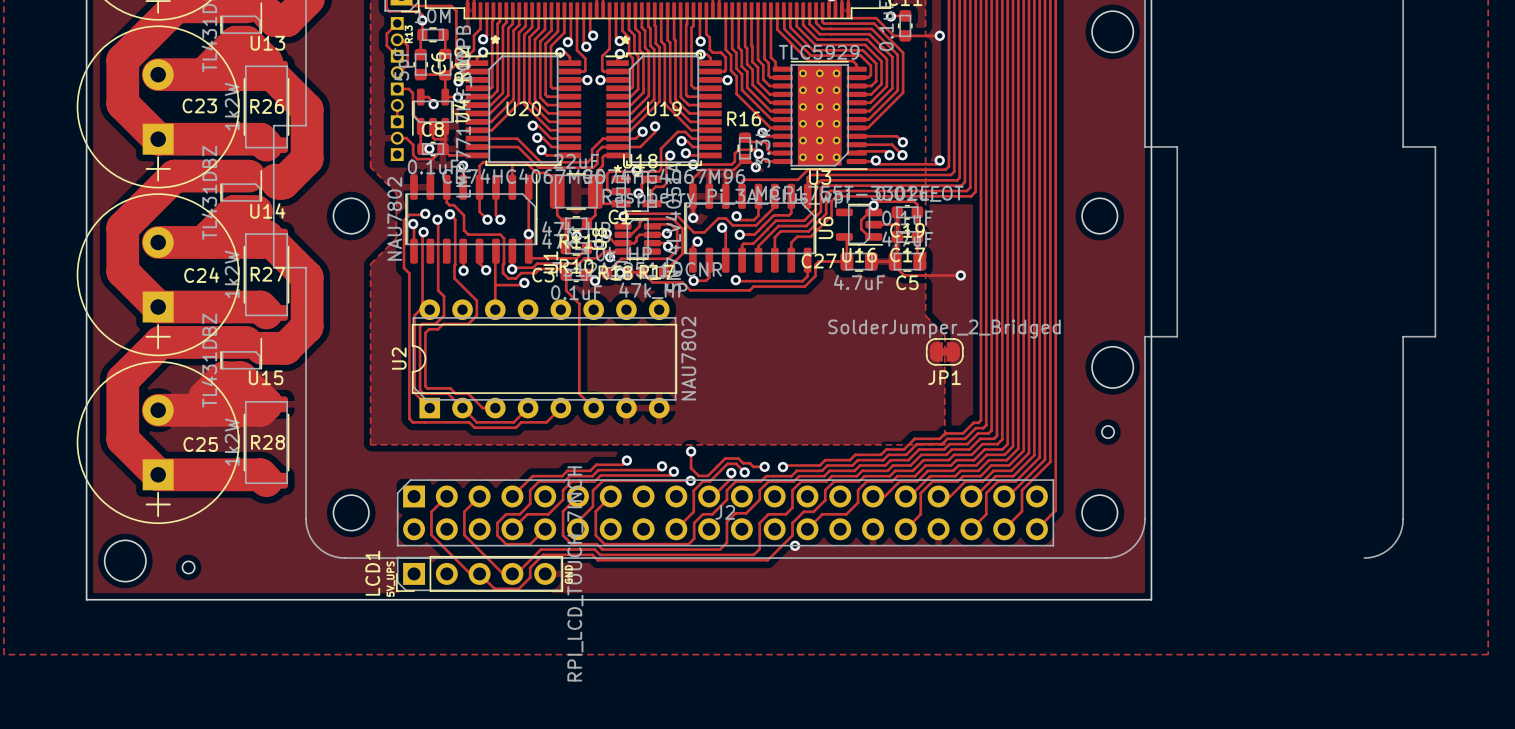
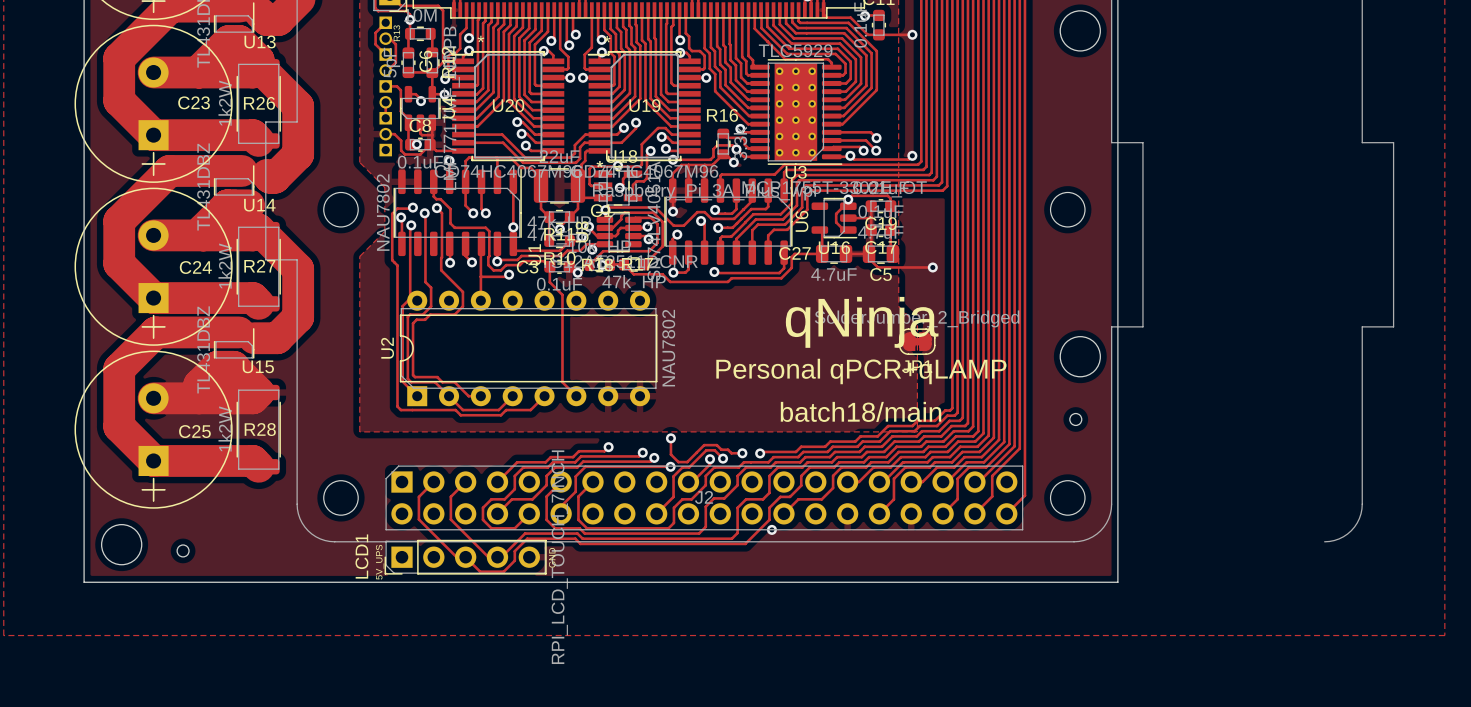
text: none -> qNinja (862, 322)
text: none -> Personal qPCR+qLAMP (861, 371)
text: none -> batch18/main (861, 411)

